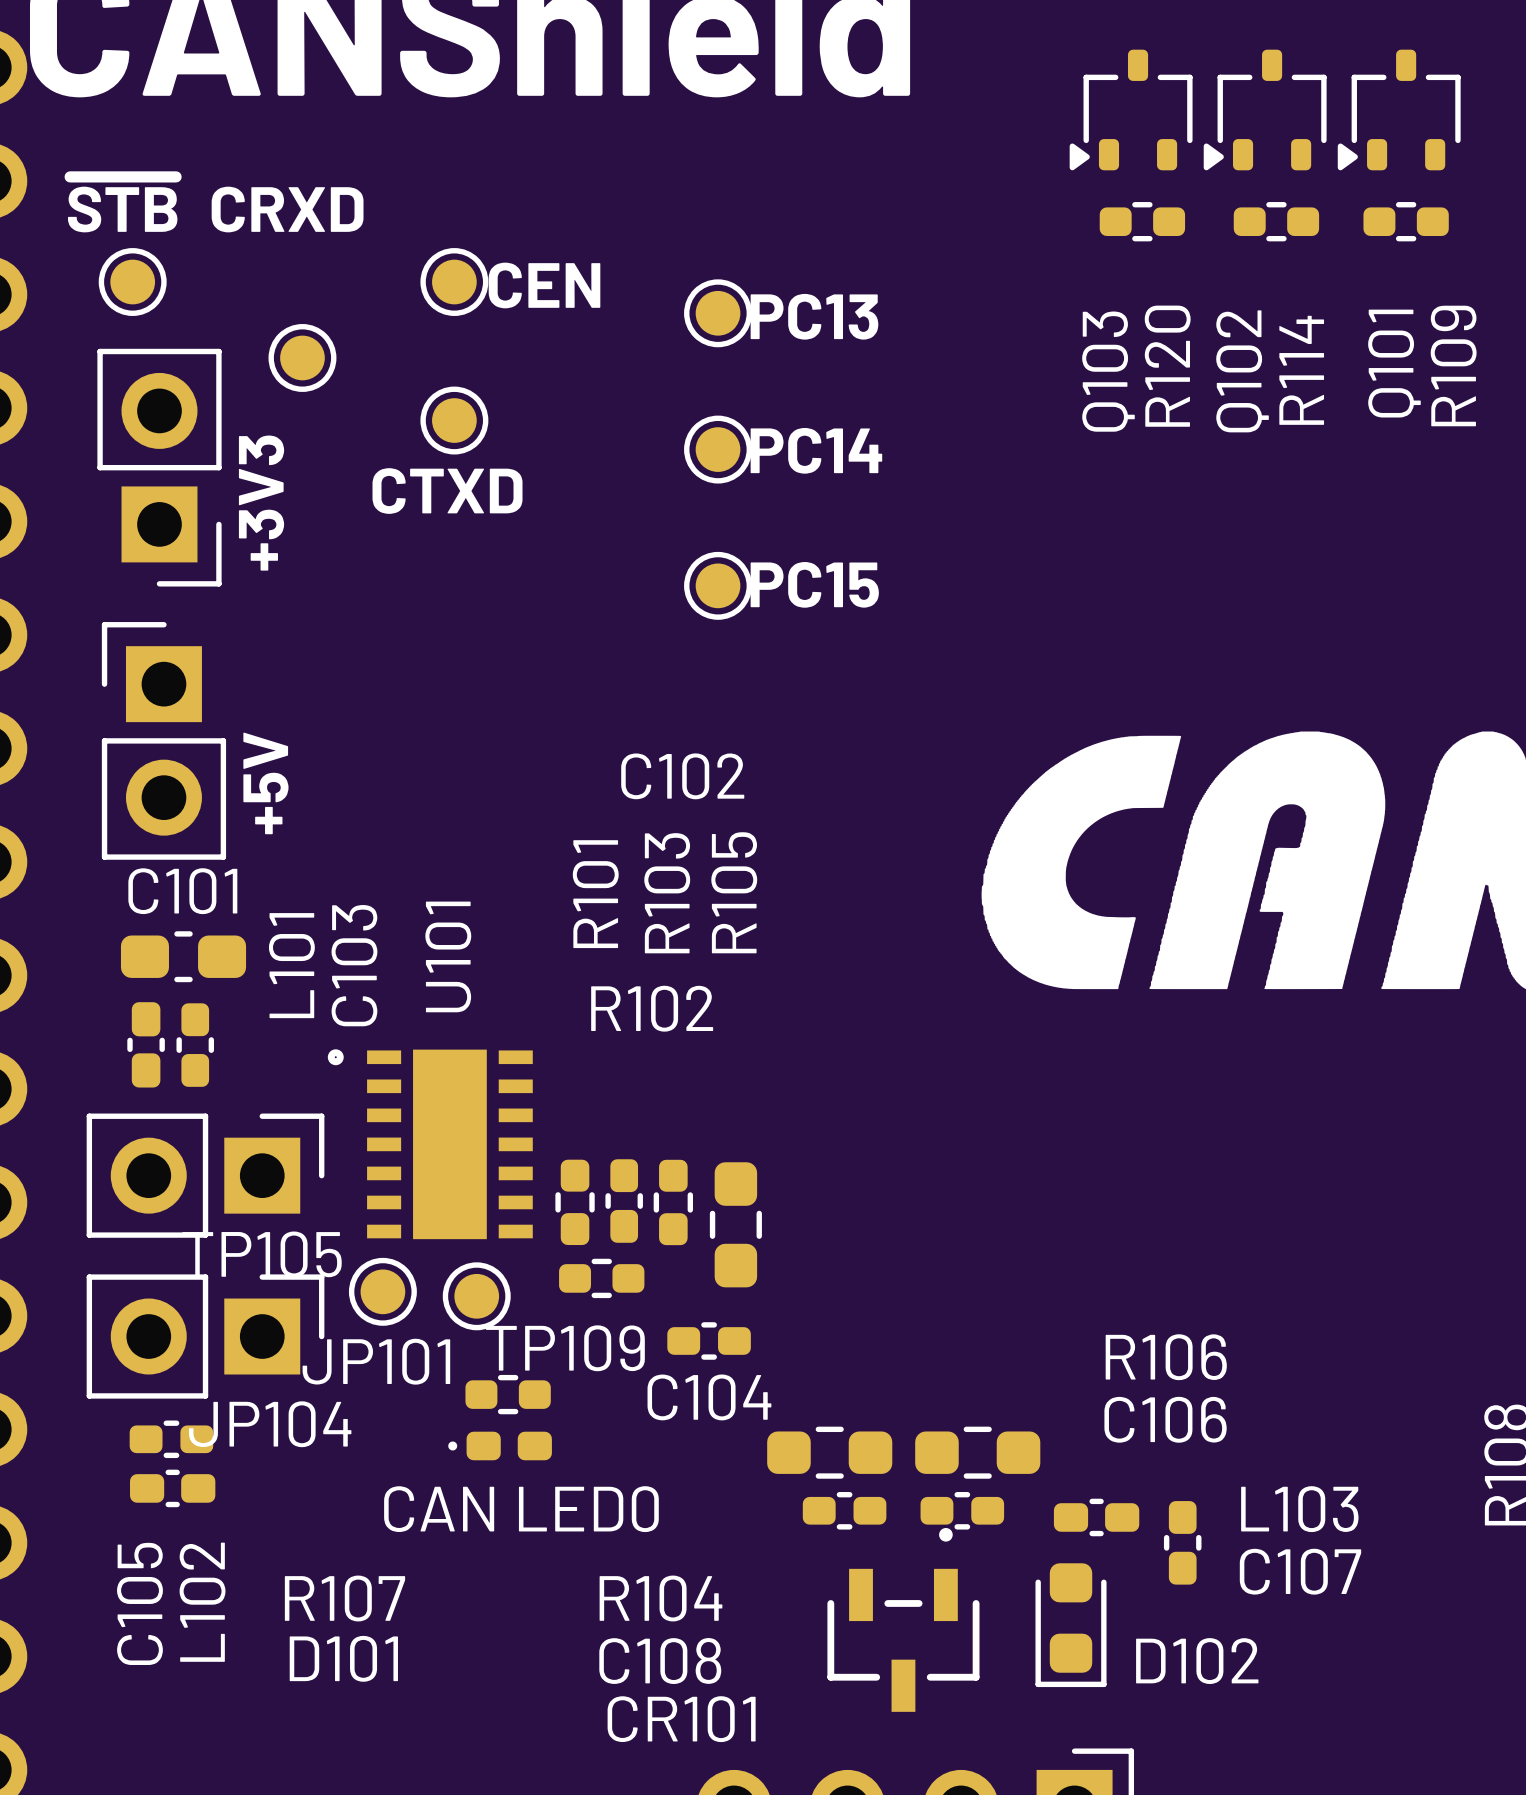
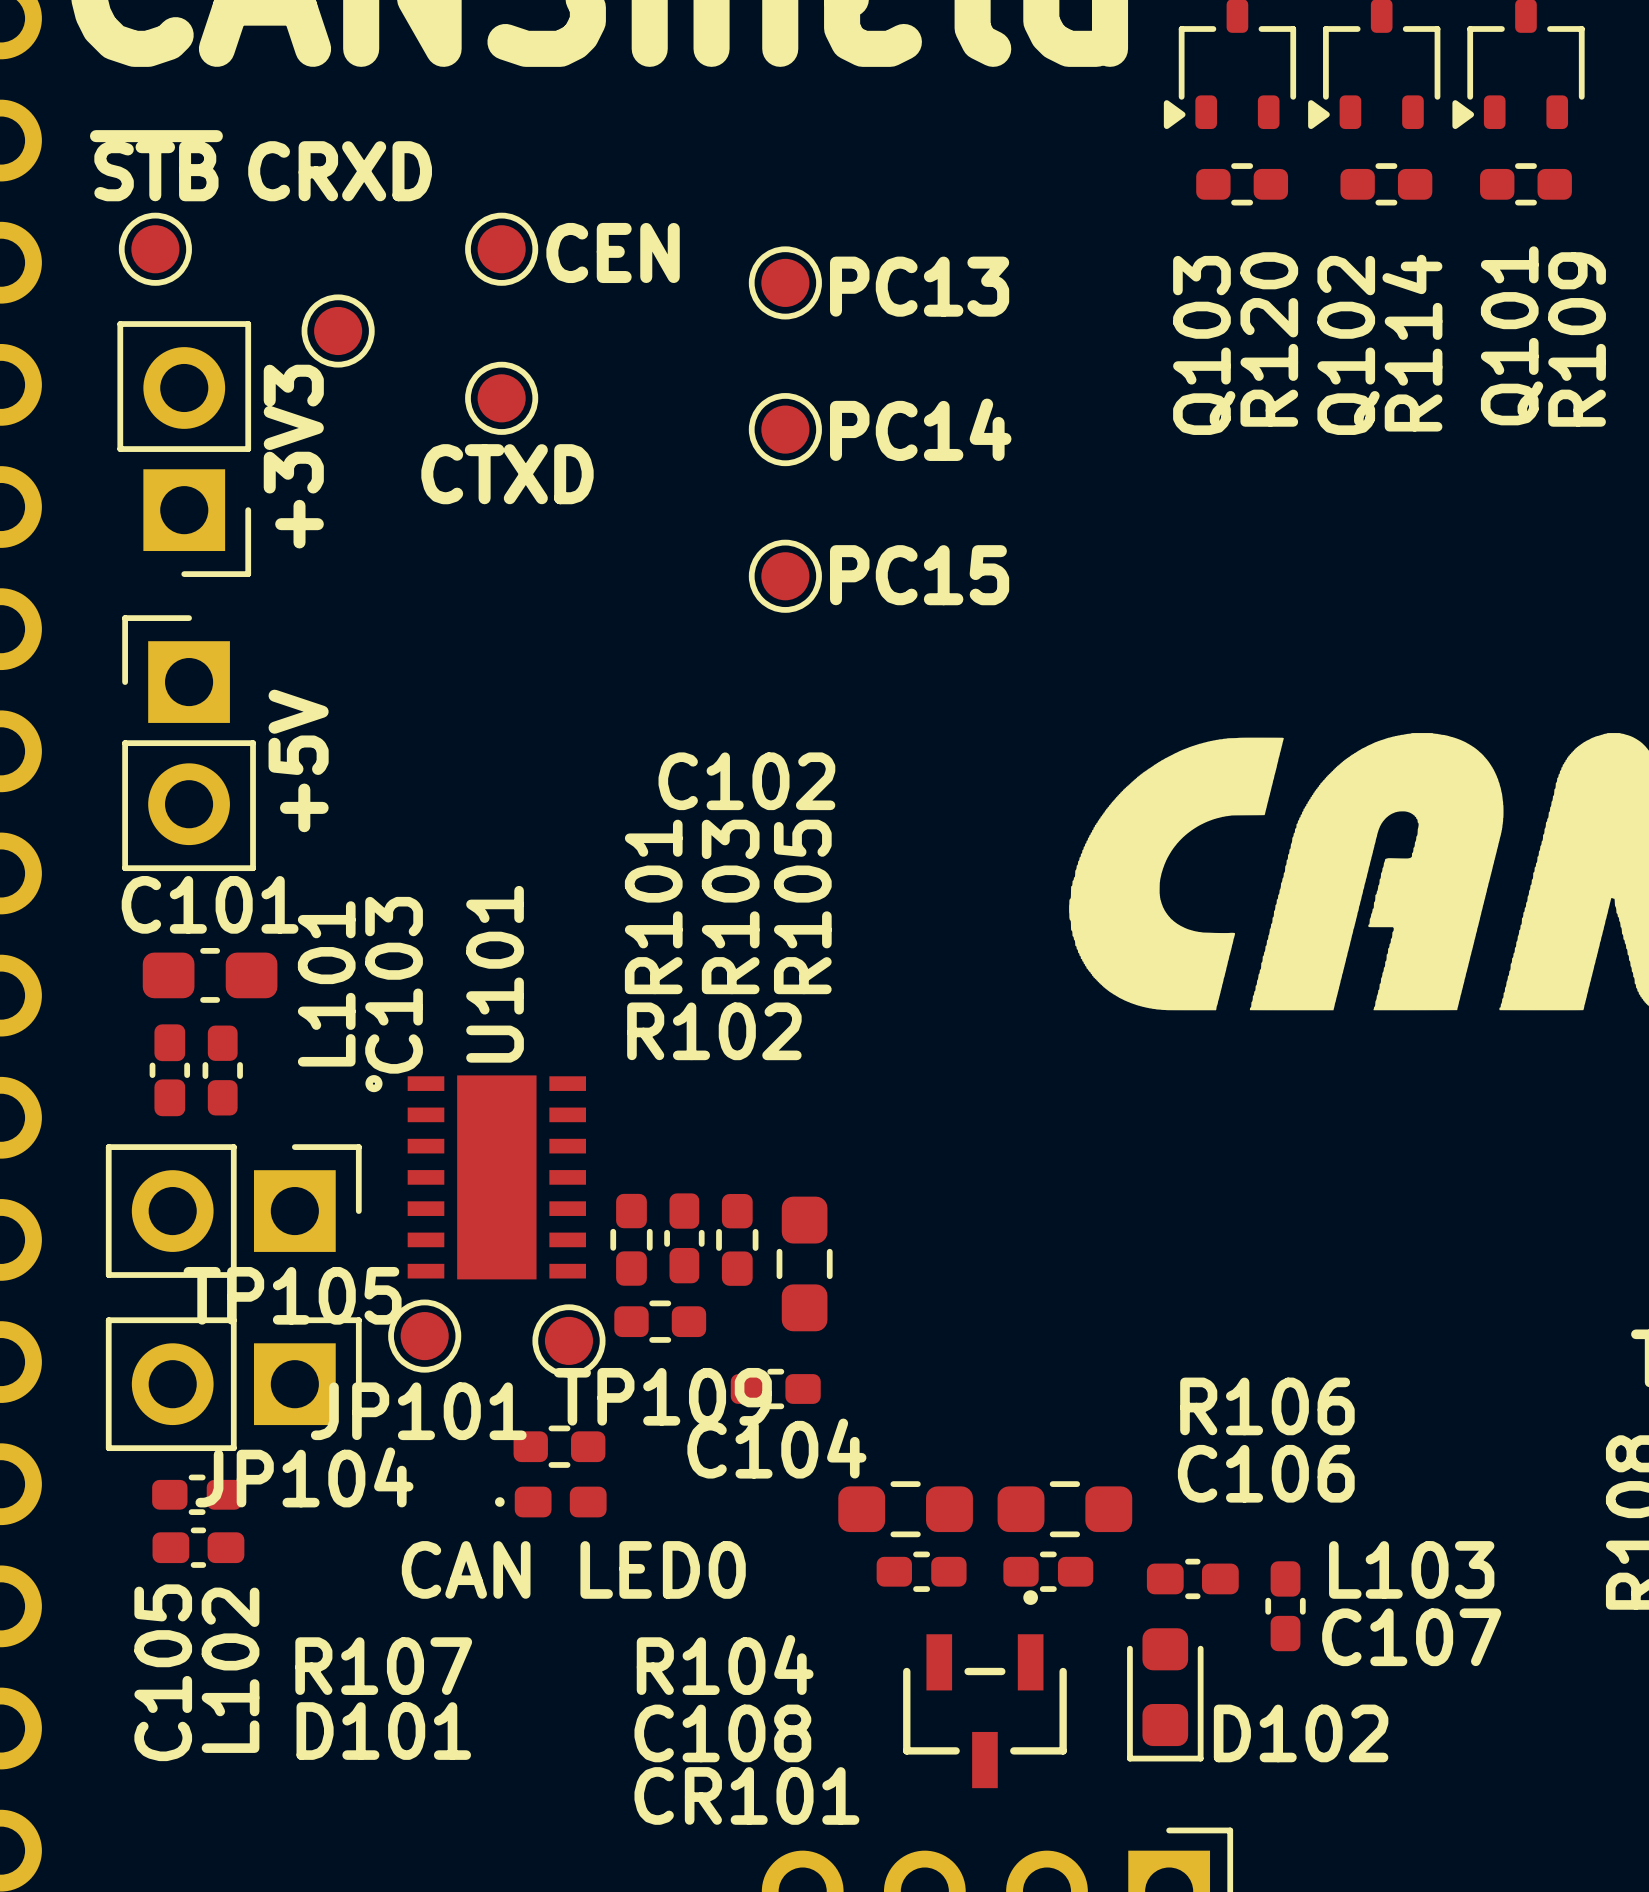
TP109 position: (476, 1296) -> (568, 1340)

